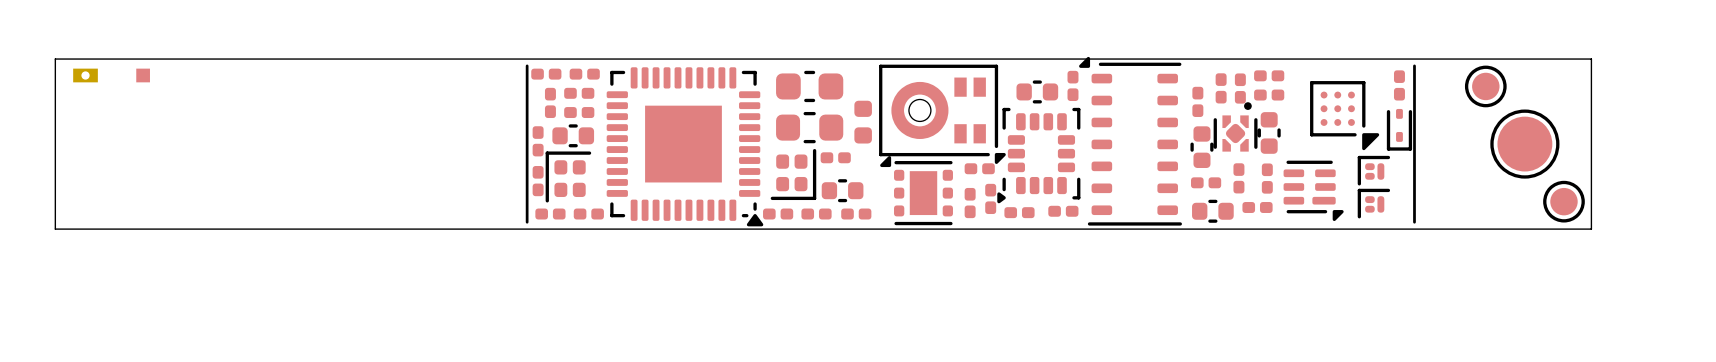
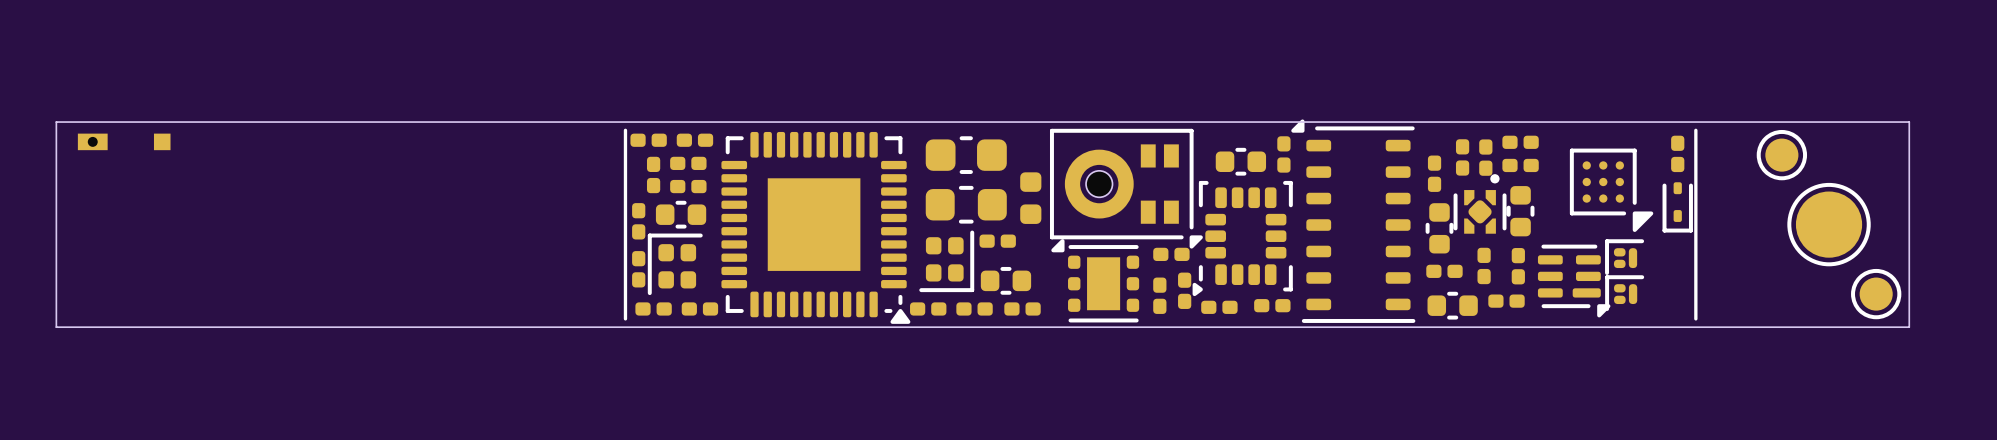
part: (1373, 170) -> none
part: none -> (1624, 257)
part: none -> (1624, 293)
part: (1373, 203) -> none

